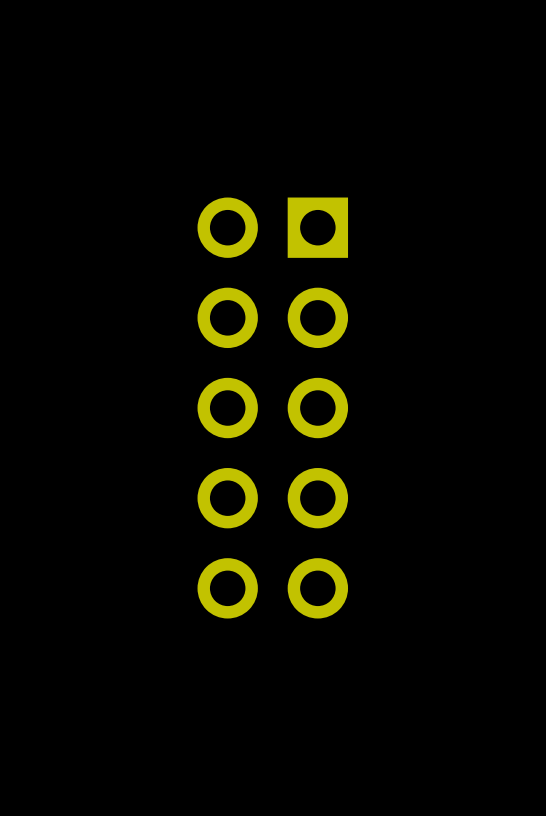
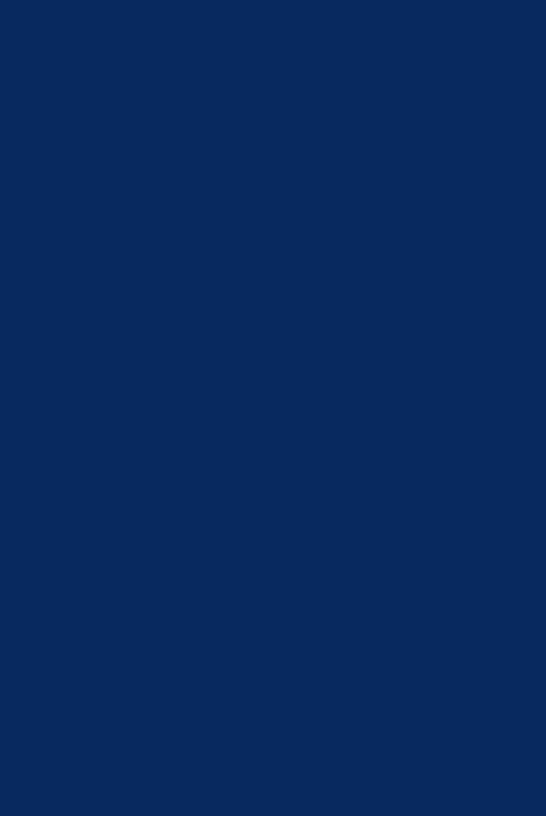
part: (272, 408) -> none

